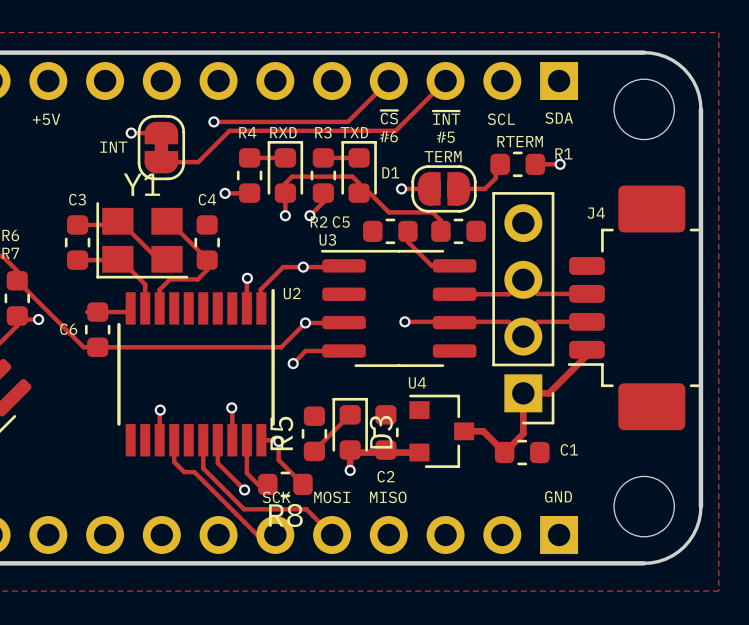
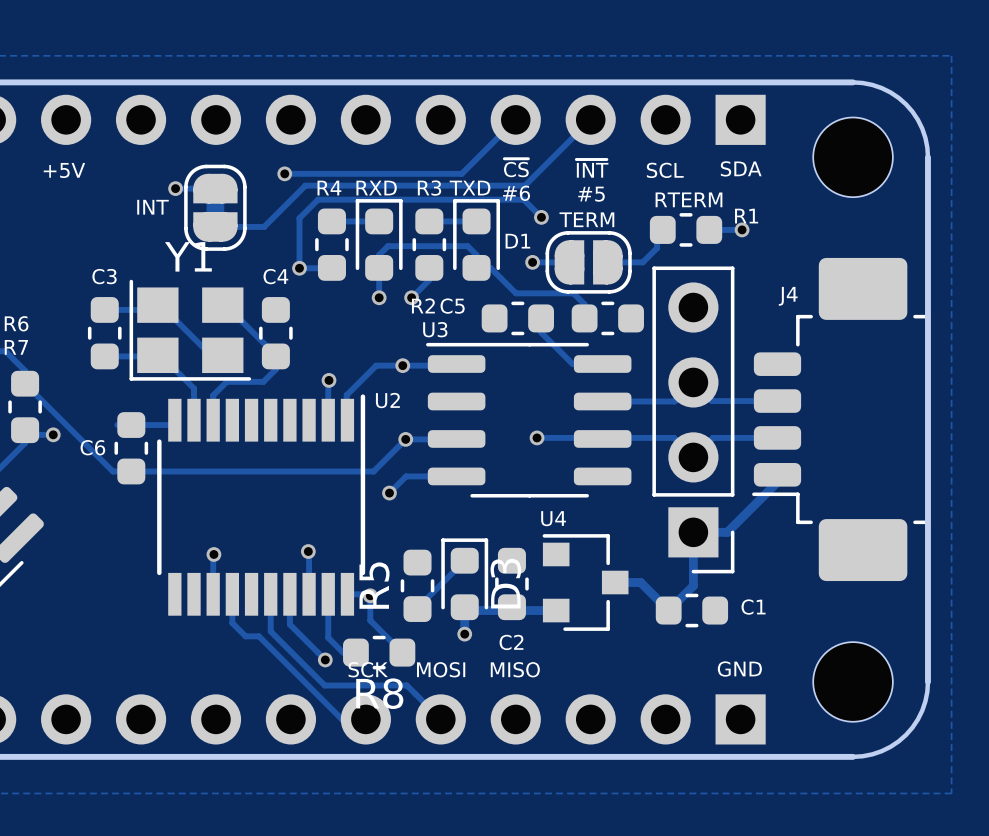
track: none -> (541, 217) (523, 199) (318, 199) (299, 218) (299, 268)
via: none -> (541, 217)

